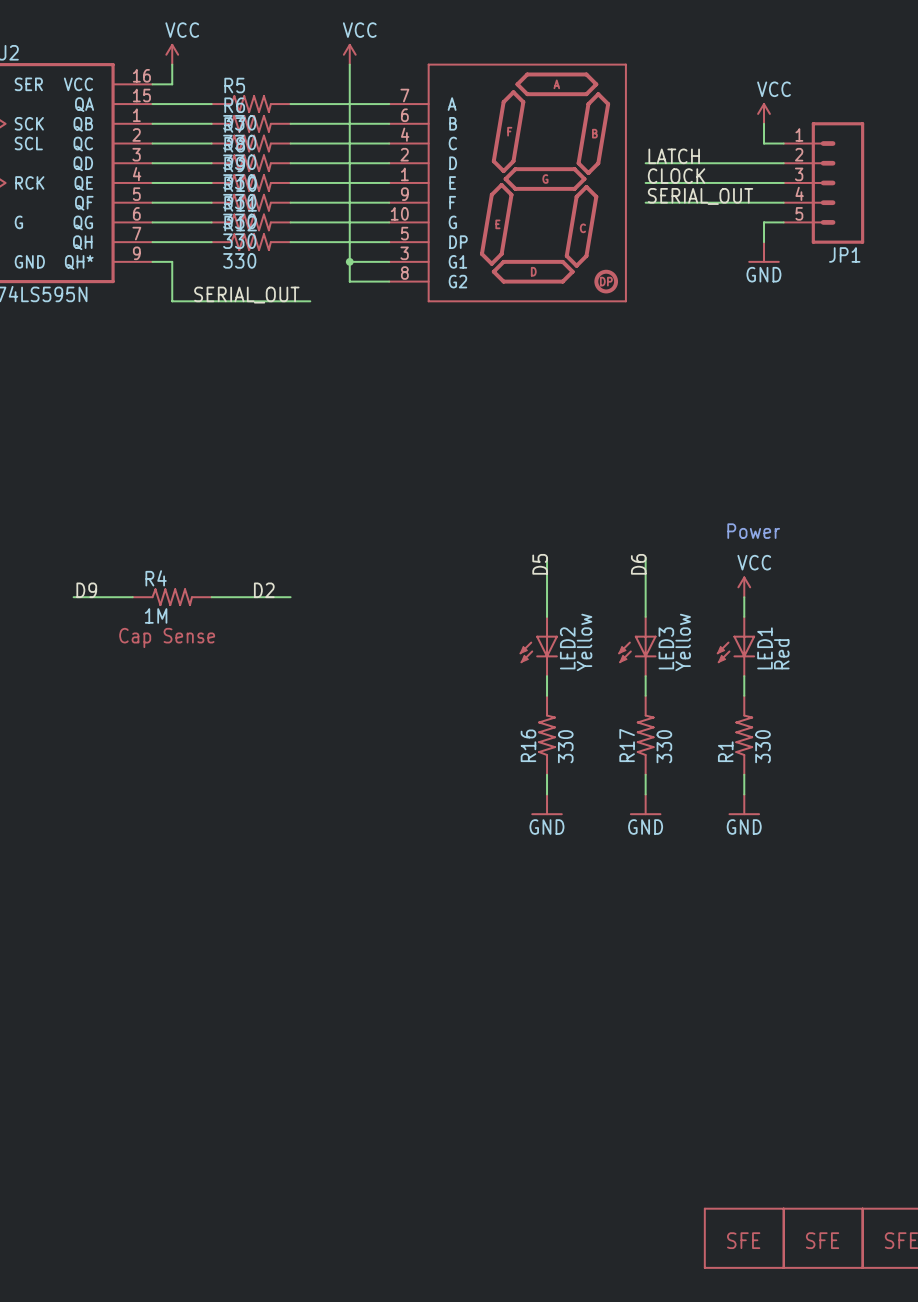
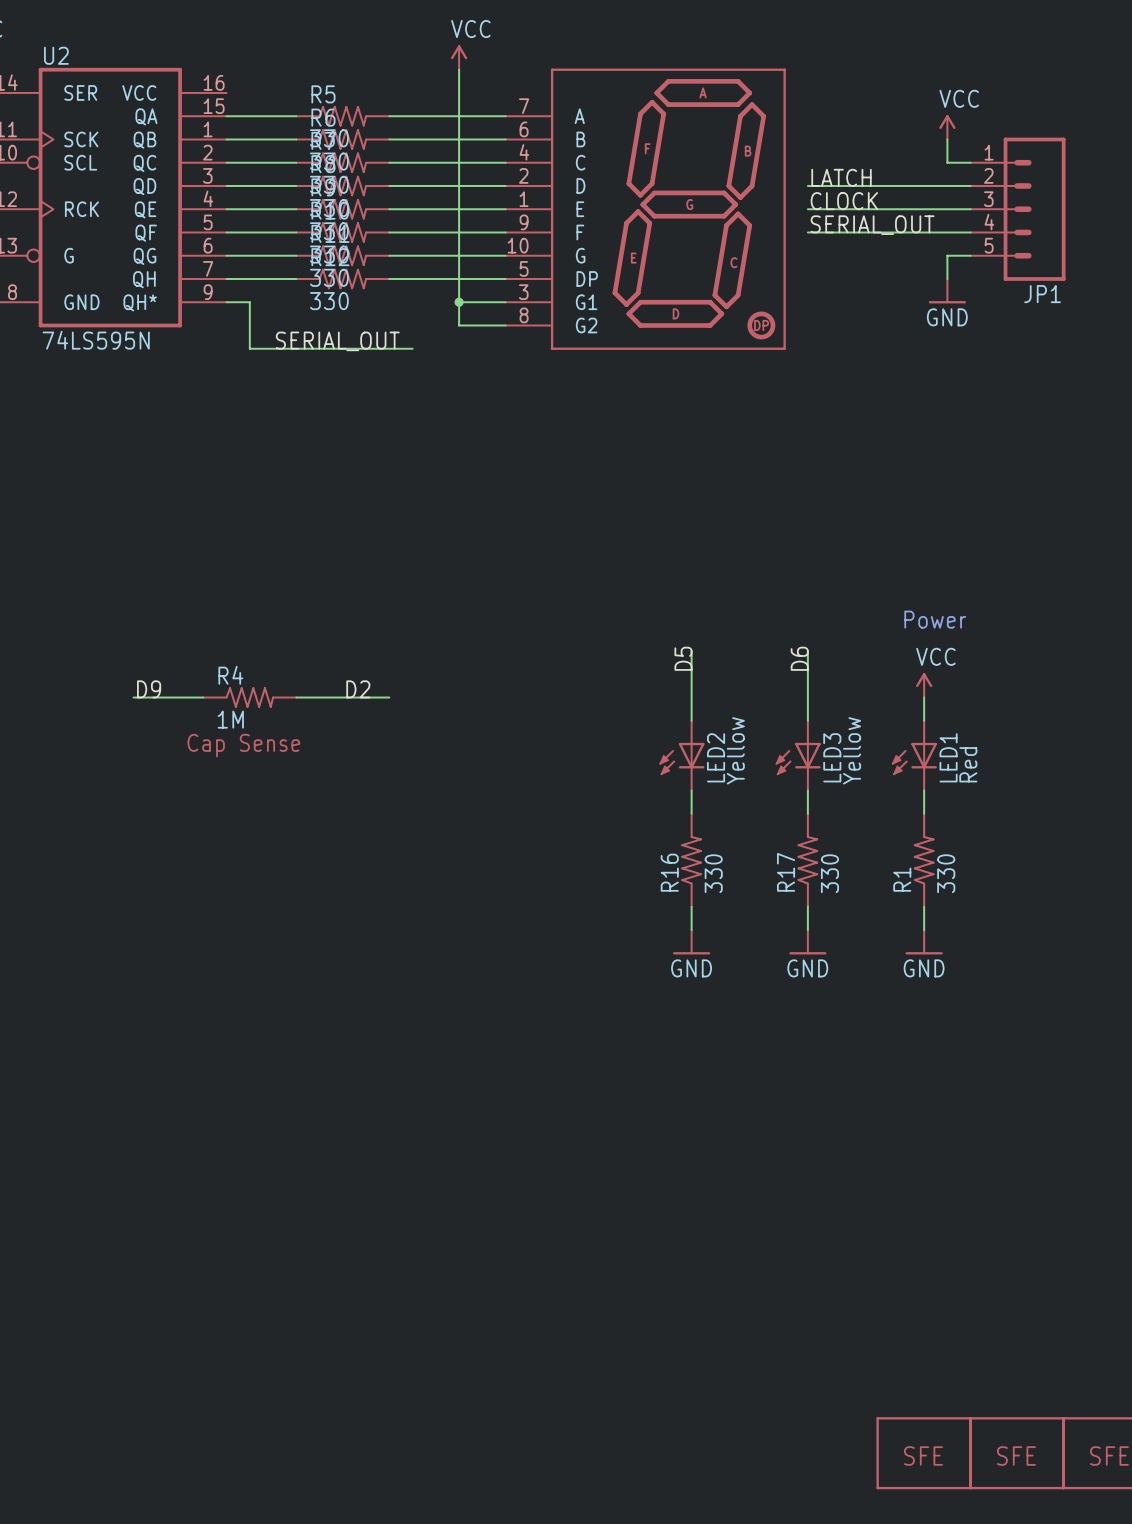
power symbol: VCC (172, 54) -> none
wire: (172, 64) (172, 84) (152, 84) -> none

